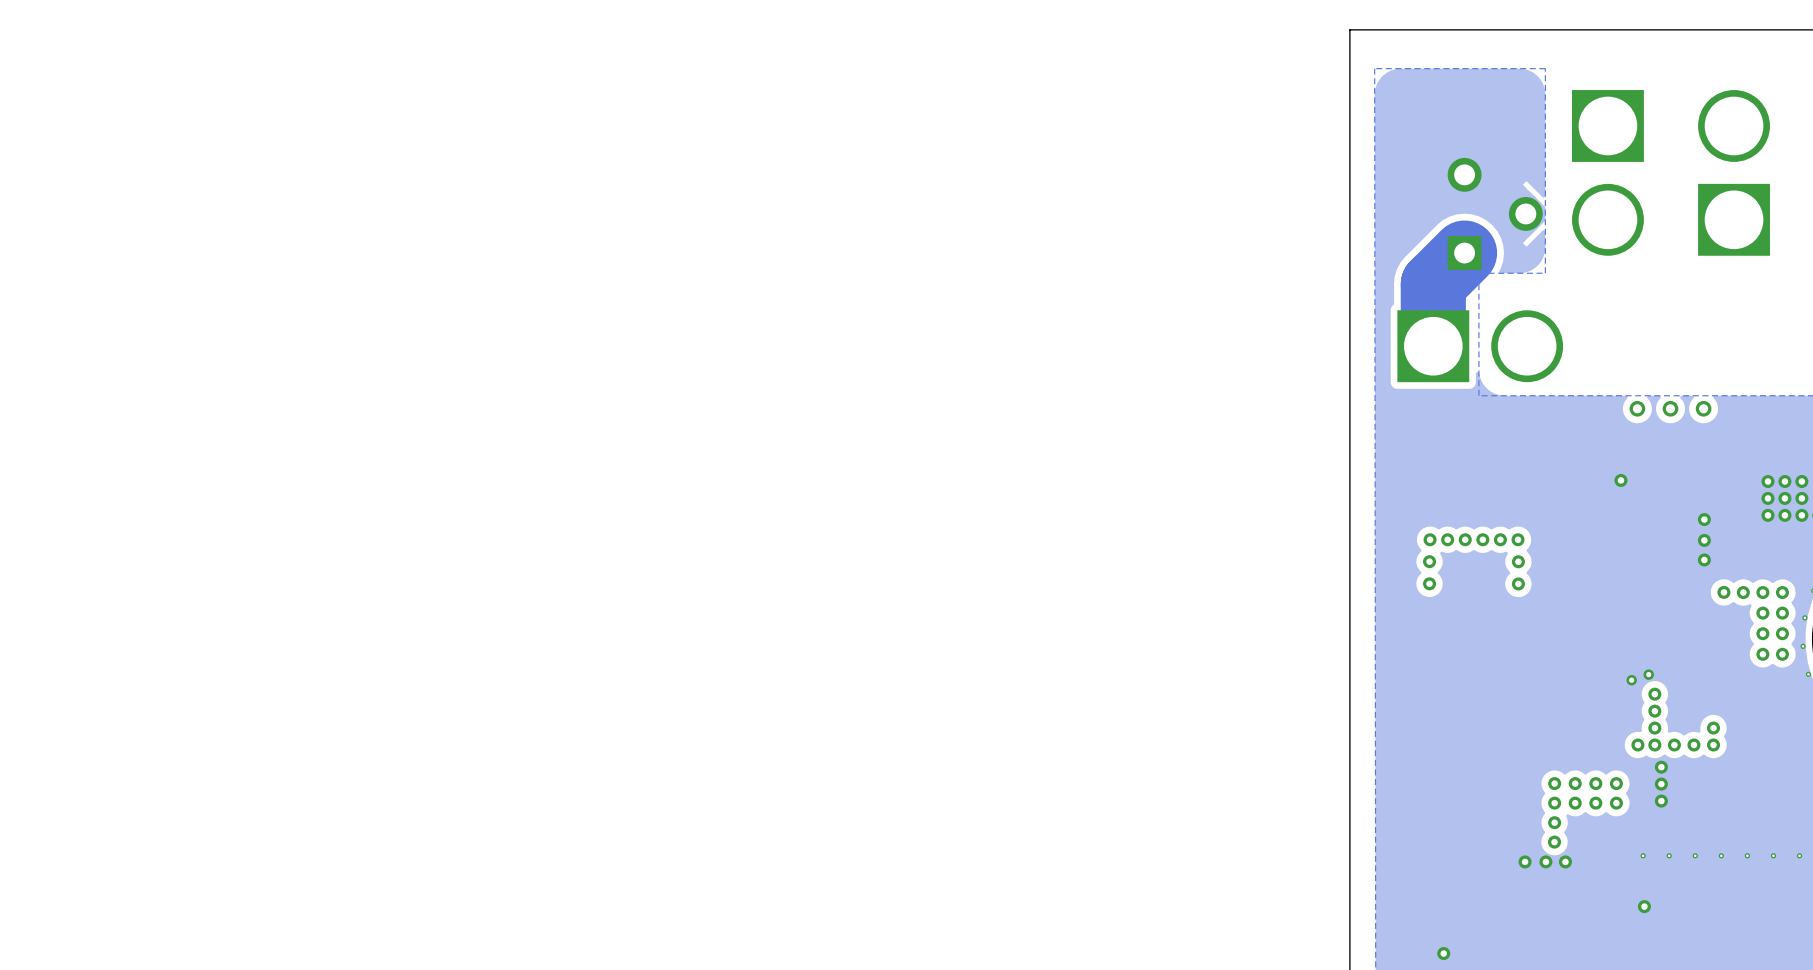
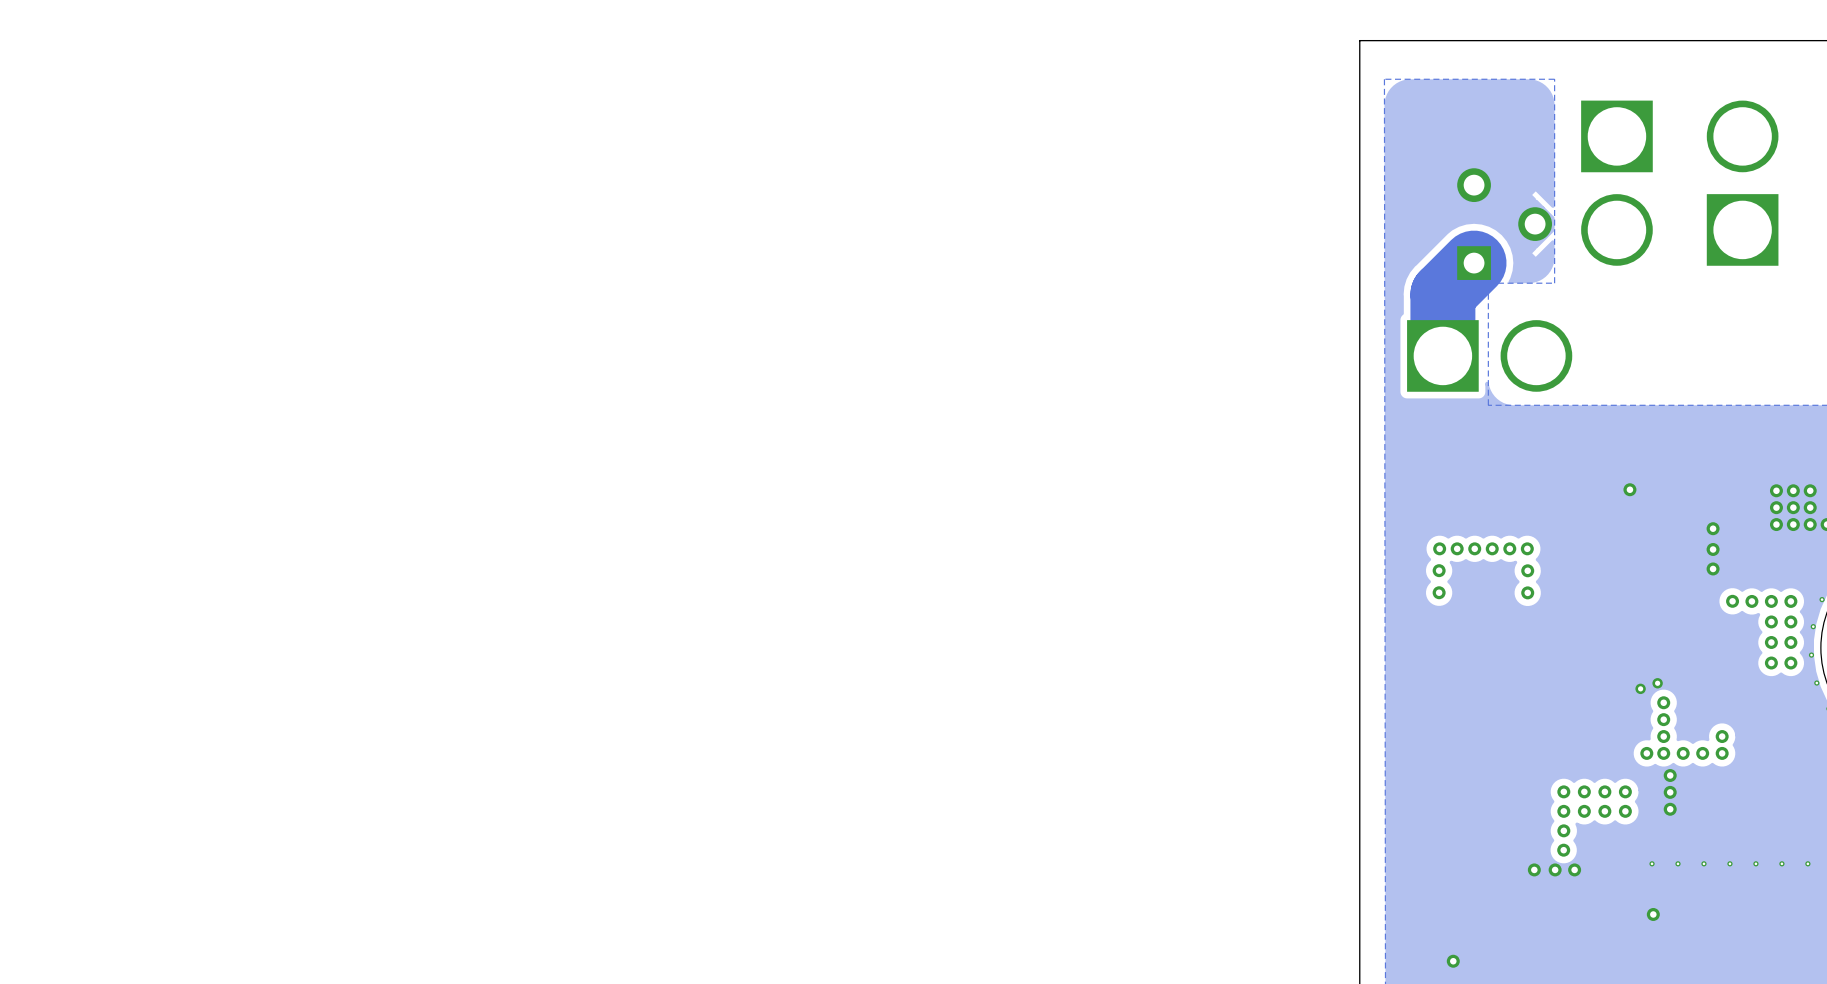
part: (1670, 408) -> none

